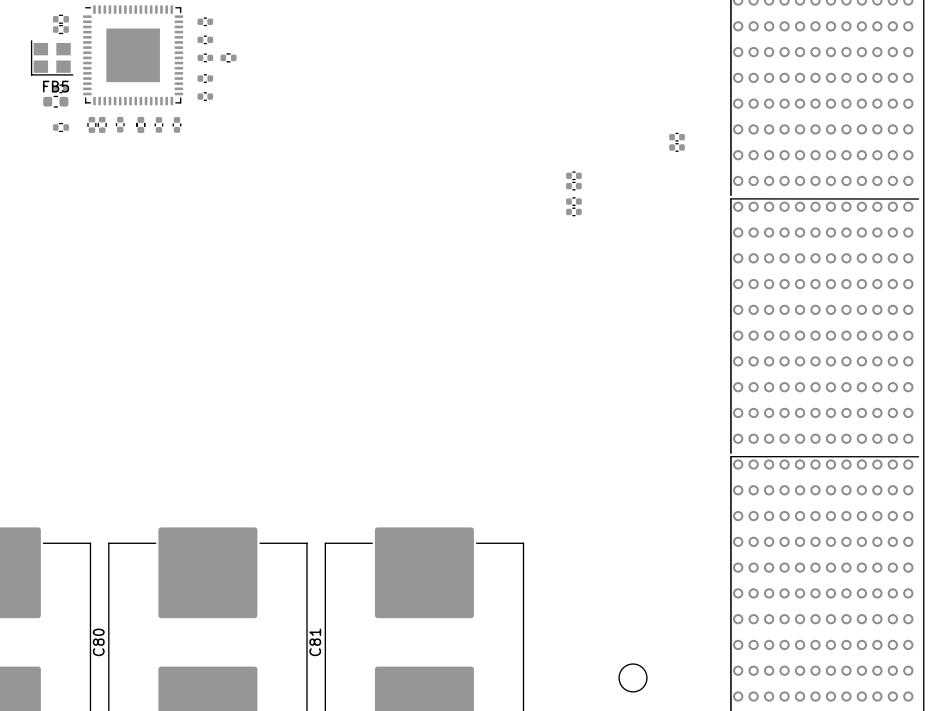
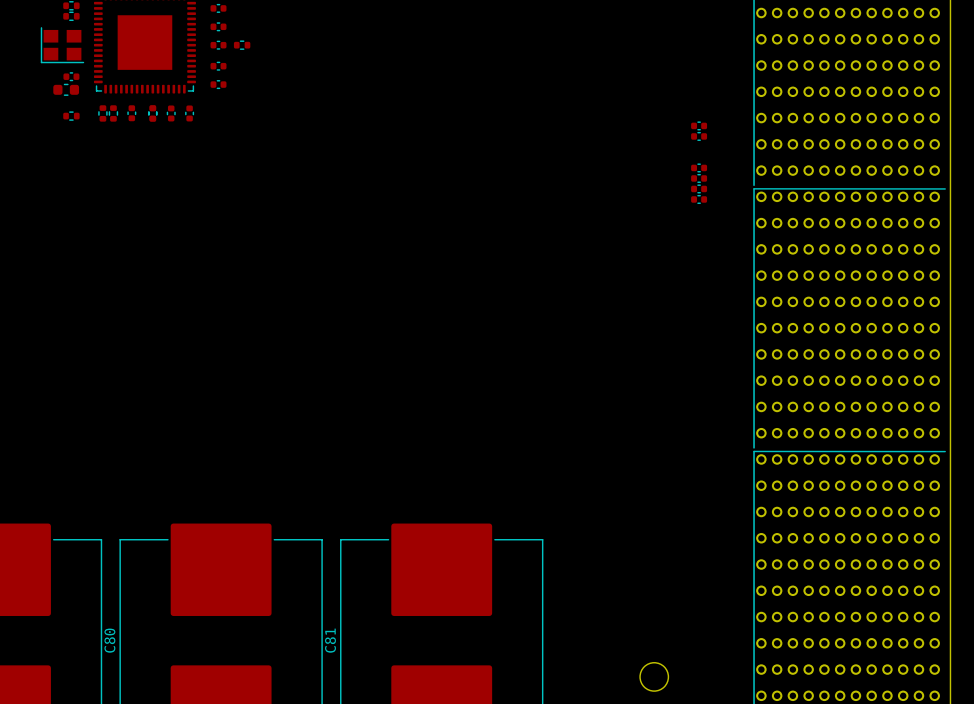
FB5 name: FB5 (56, 86) -> none
part: (573, 175) -> none
part: none -> (699, 167)
part: (573, 186) -> none
part: none -> (699, 178)
part: none -> (699, 188)
part: (573, 201) -> none
part: none -> (699, 199)
part: (573, 211) -> none

